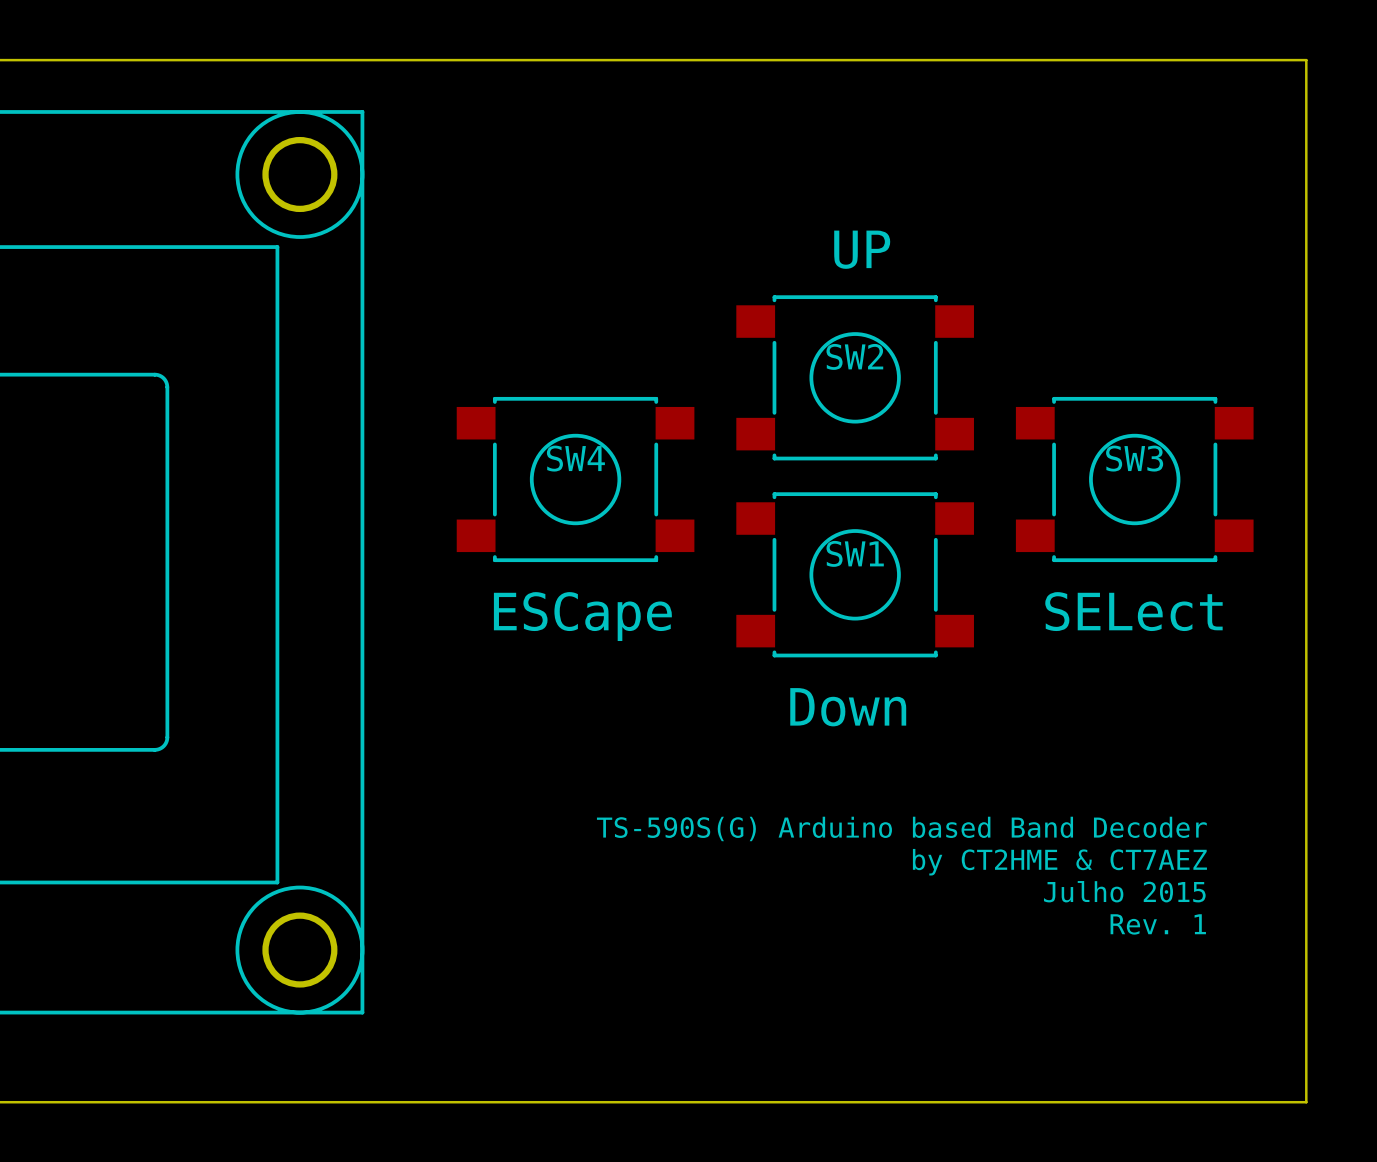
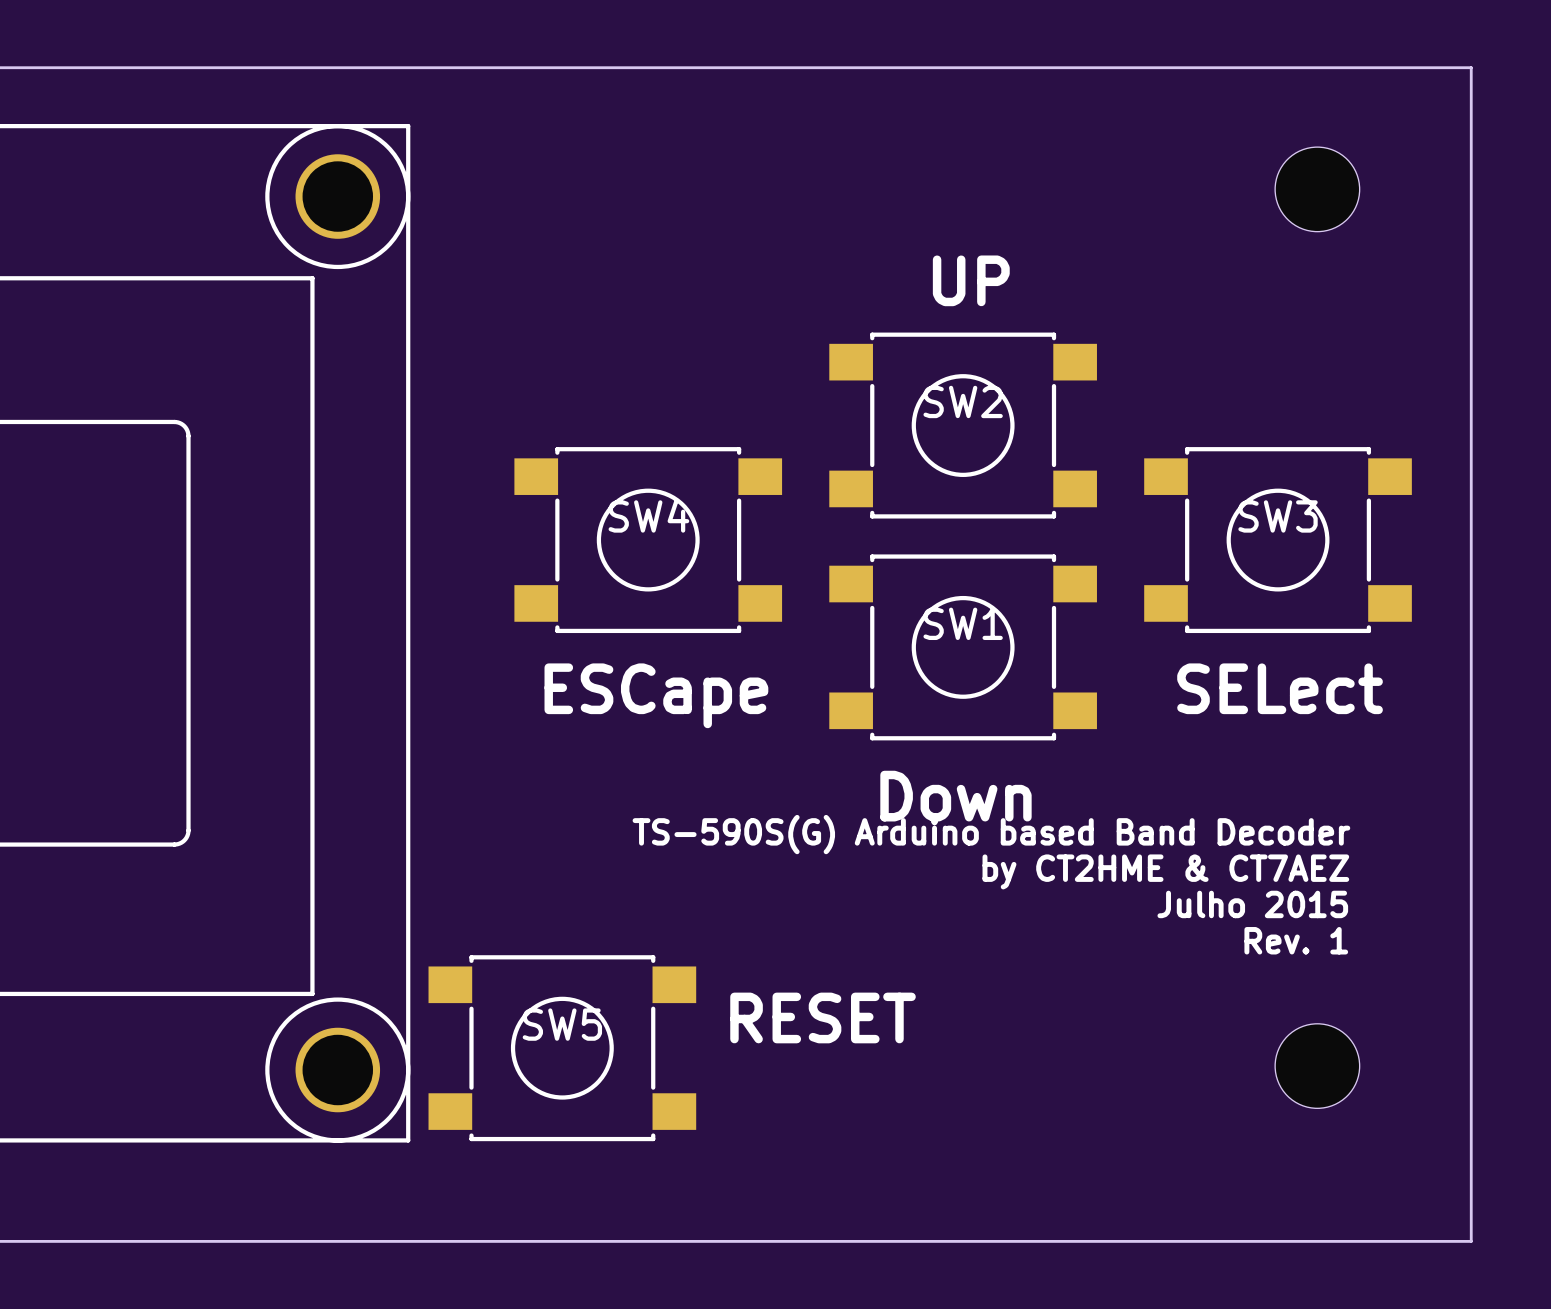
part: none -> (1317, 189)
text: none -> TS-590S(G) Arduino based Band Decoder (991, 834)
text: TS-590S(G) Arduino based Band Decoder (901, 828) -> Rev. 1 (1296, 940)
text position: by CT2HME & CT7AEZ (1059, 862) -> by CT2HME & CT7AEZ (1165, 871)
text position: Julho 2015 (1124, 891) -> Julho 2015 (1252, 904)
text: none -> RESET (823, 1017)
text: Rev. 1 (1158, 924) -> none
SW5: none -> (562, 1048)
part: none -> (1317, 1066)

